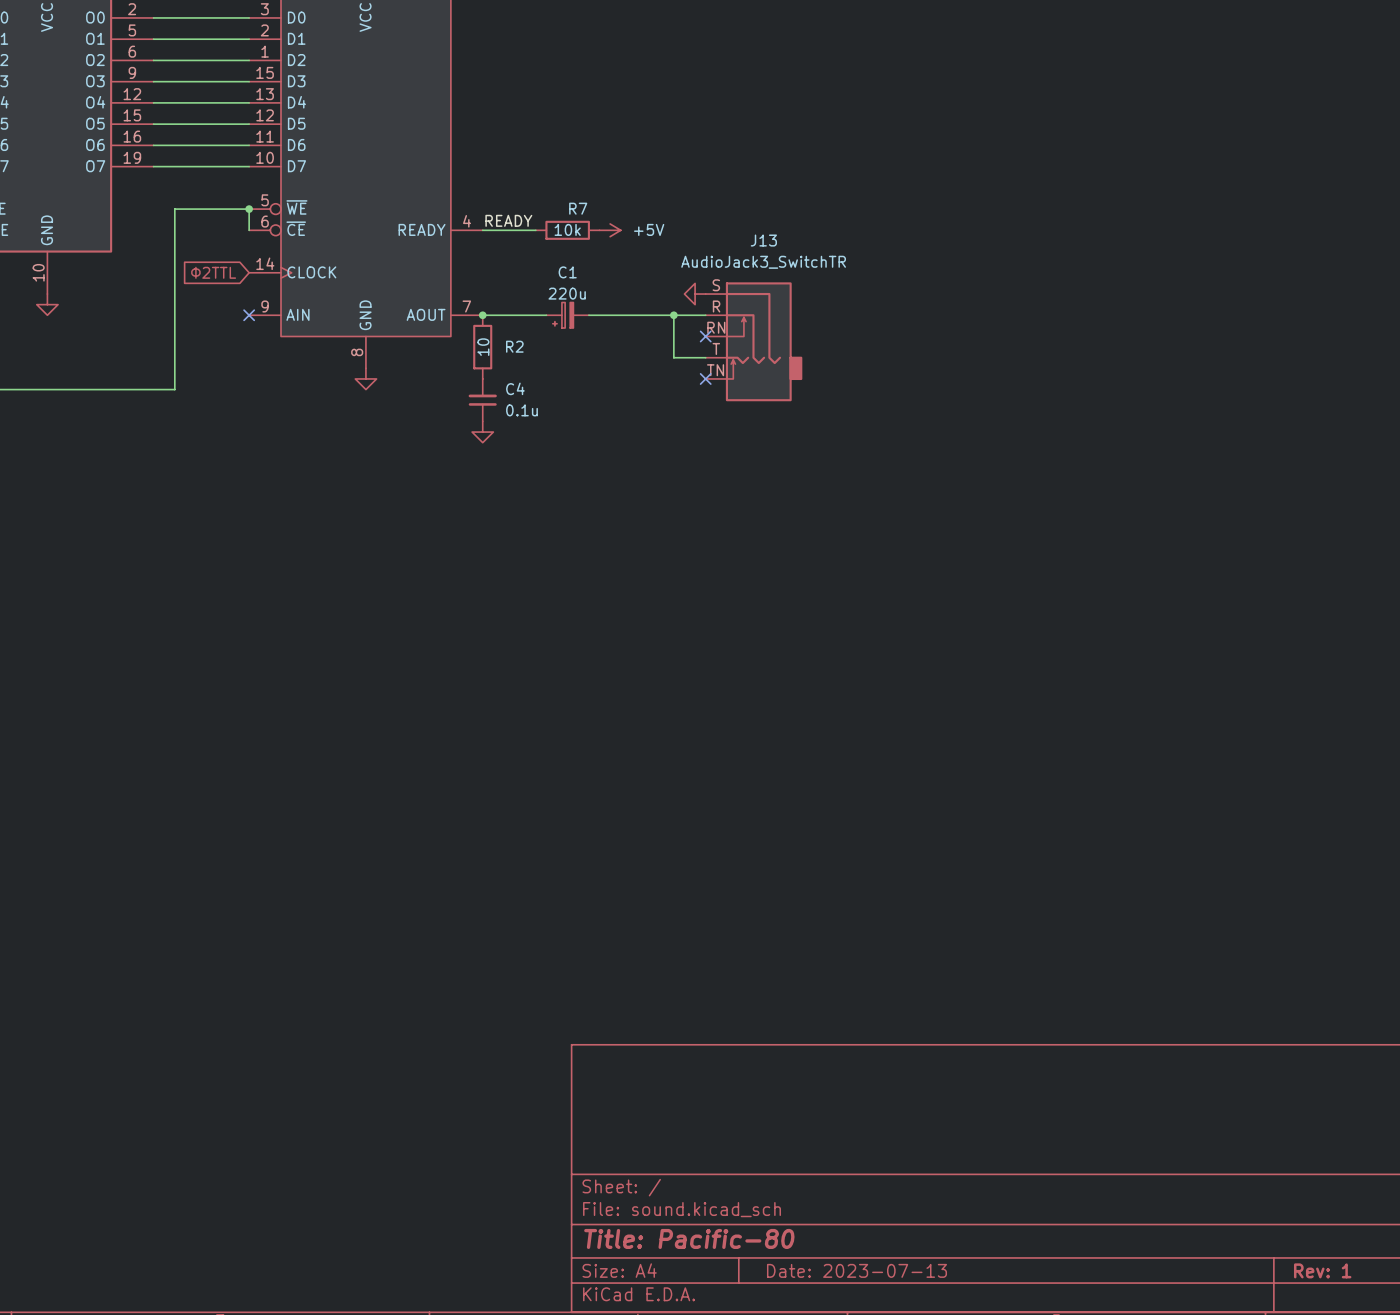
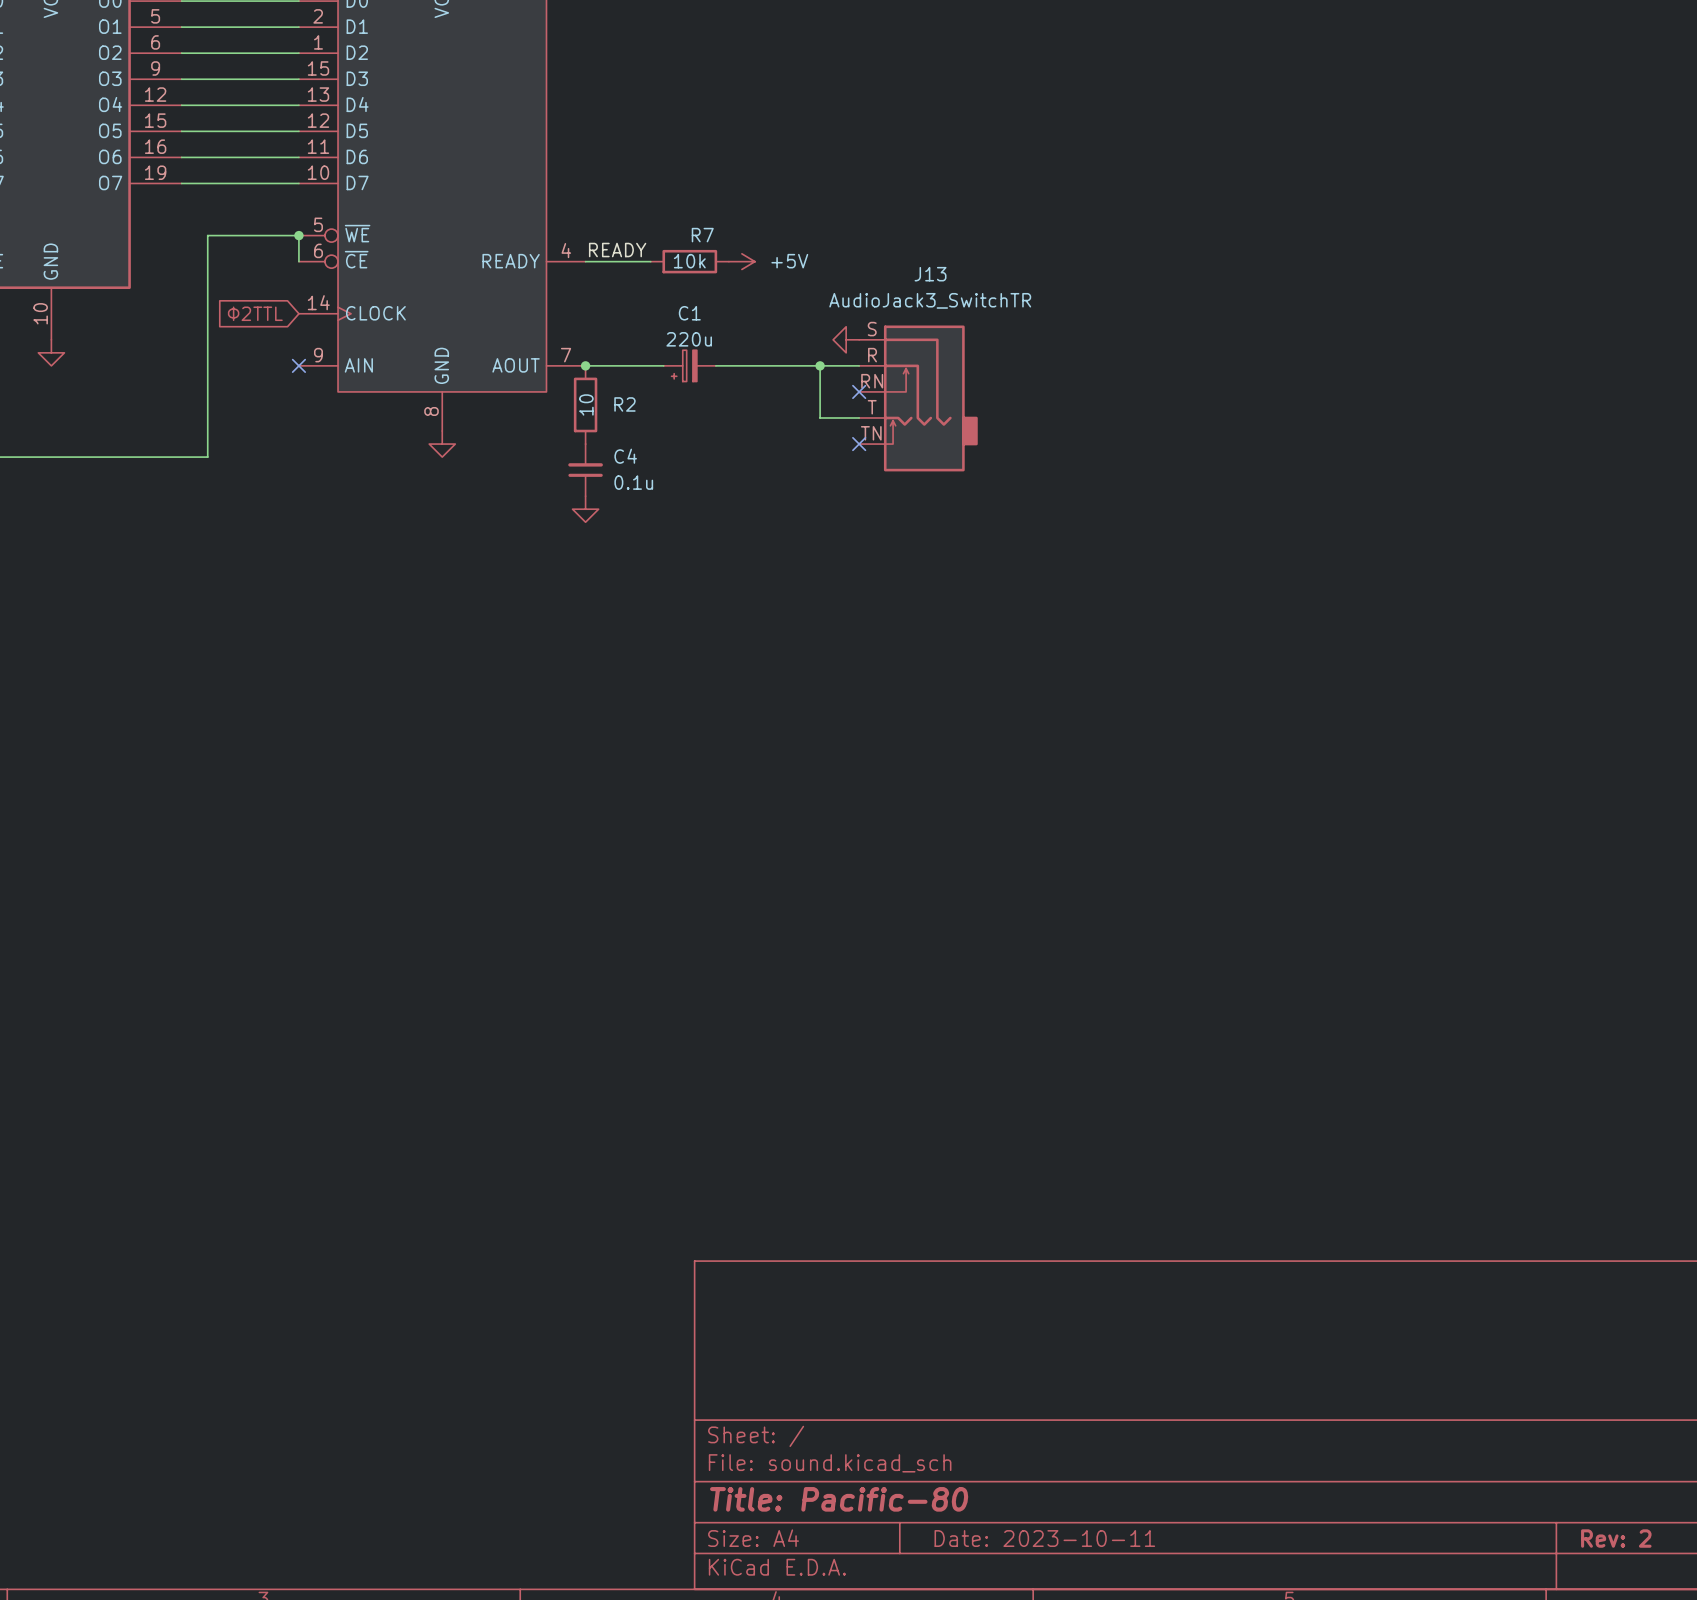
title block: Date: 2023-07-13 (856, 1270) -> Date: 2023-10-11 (1044, 1538)
title block: Rev: 1 (1322, 1270) -> Rev: 2 (1616, 1538)

